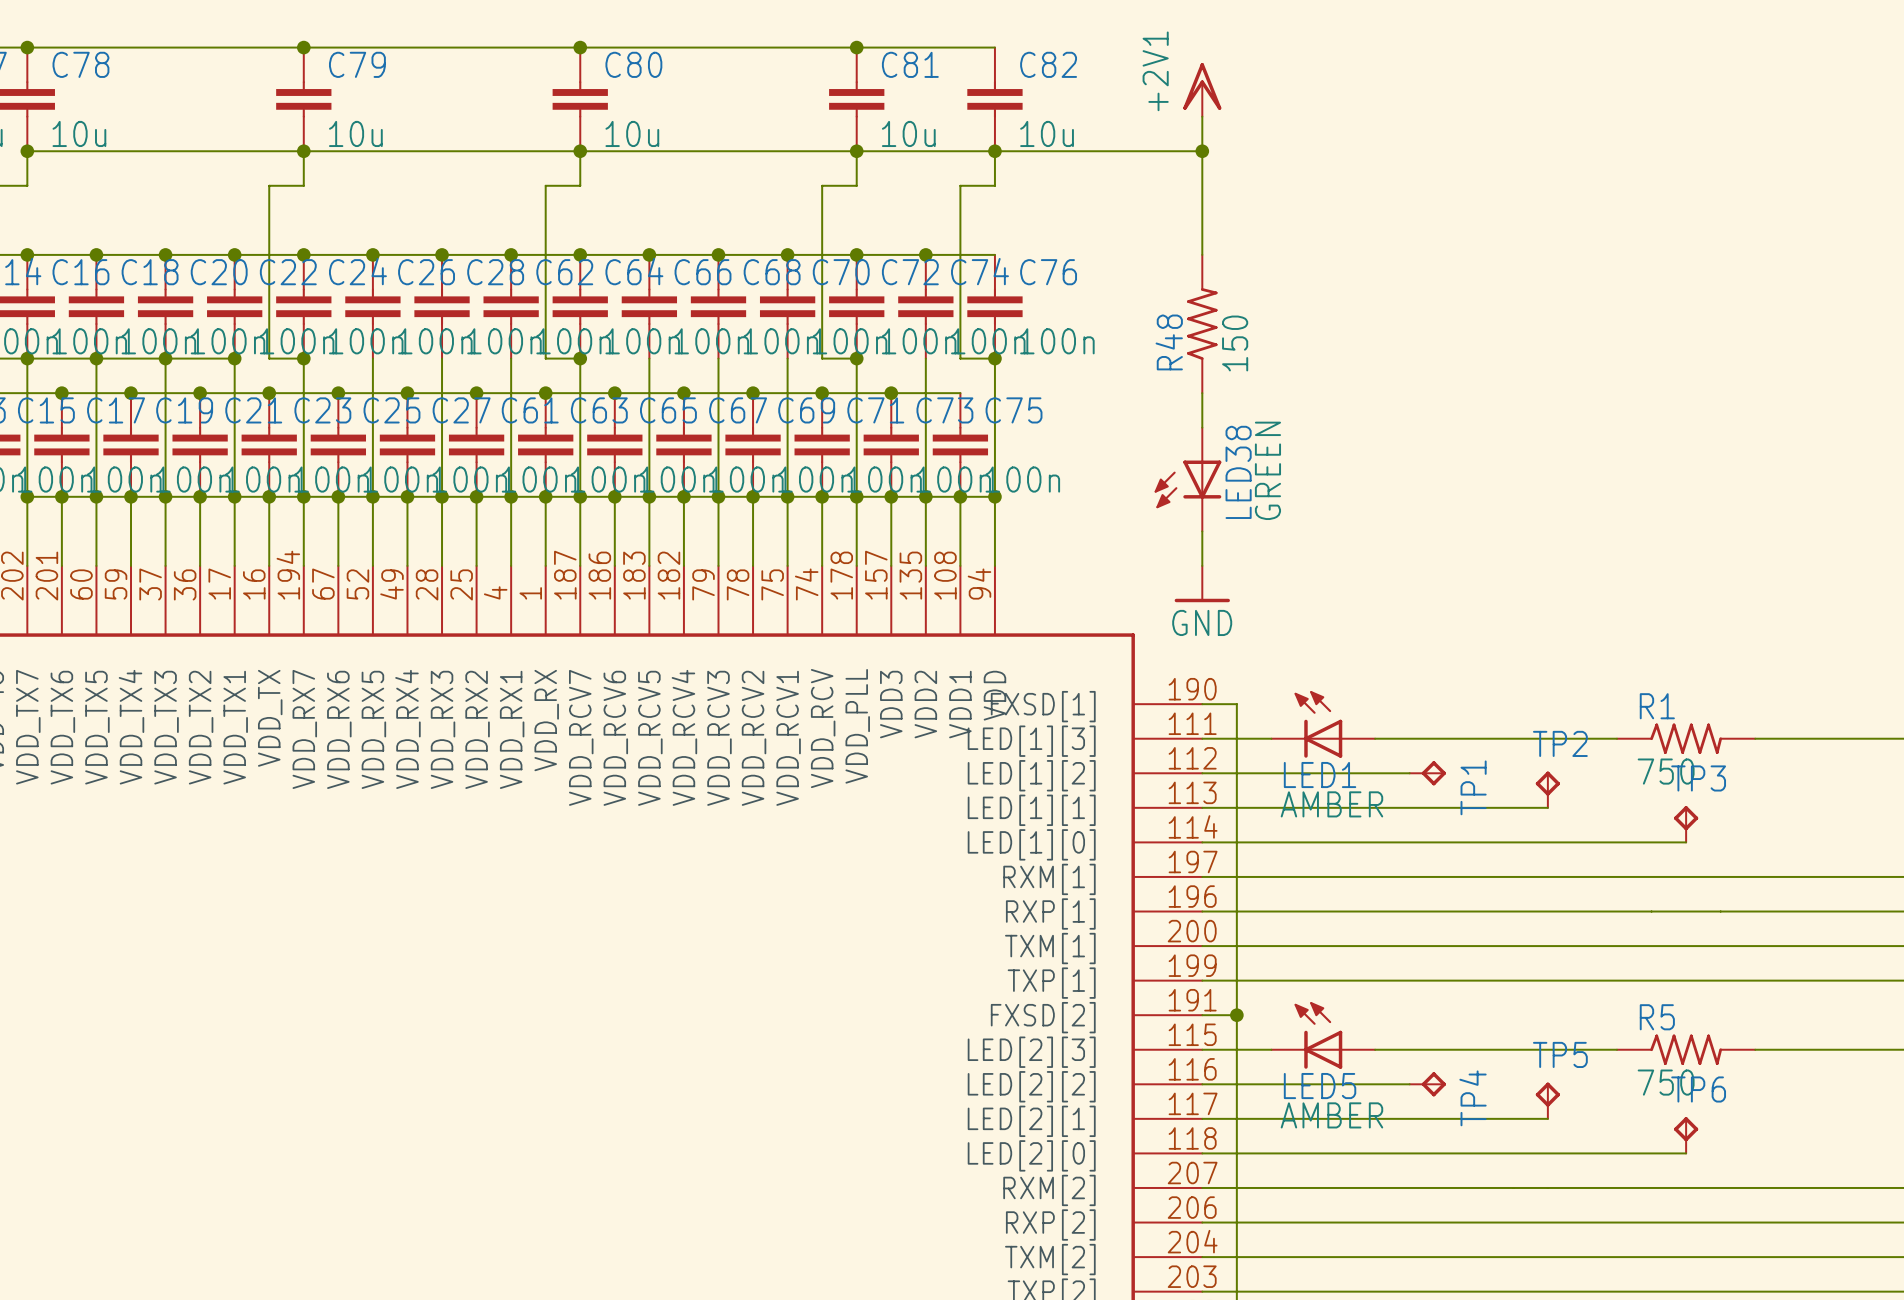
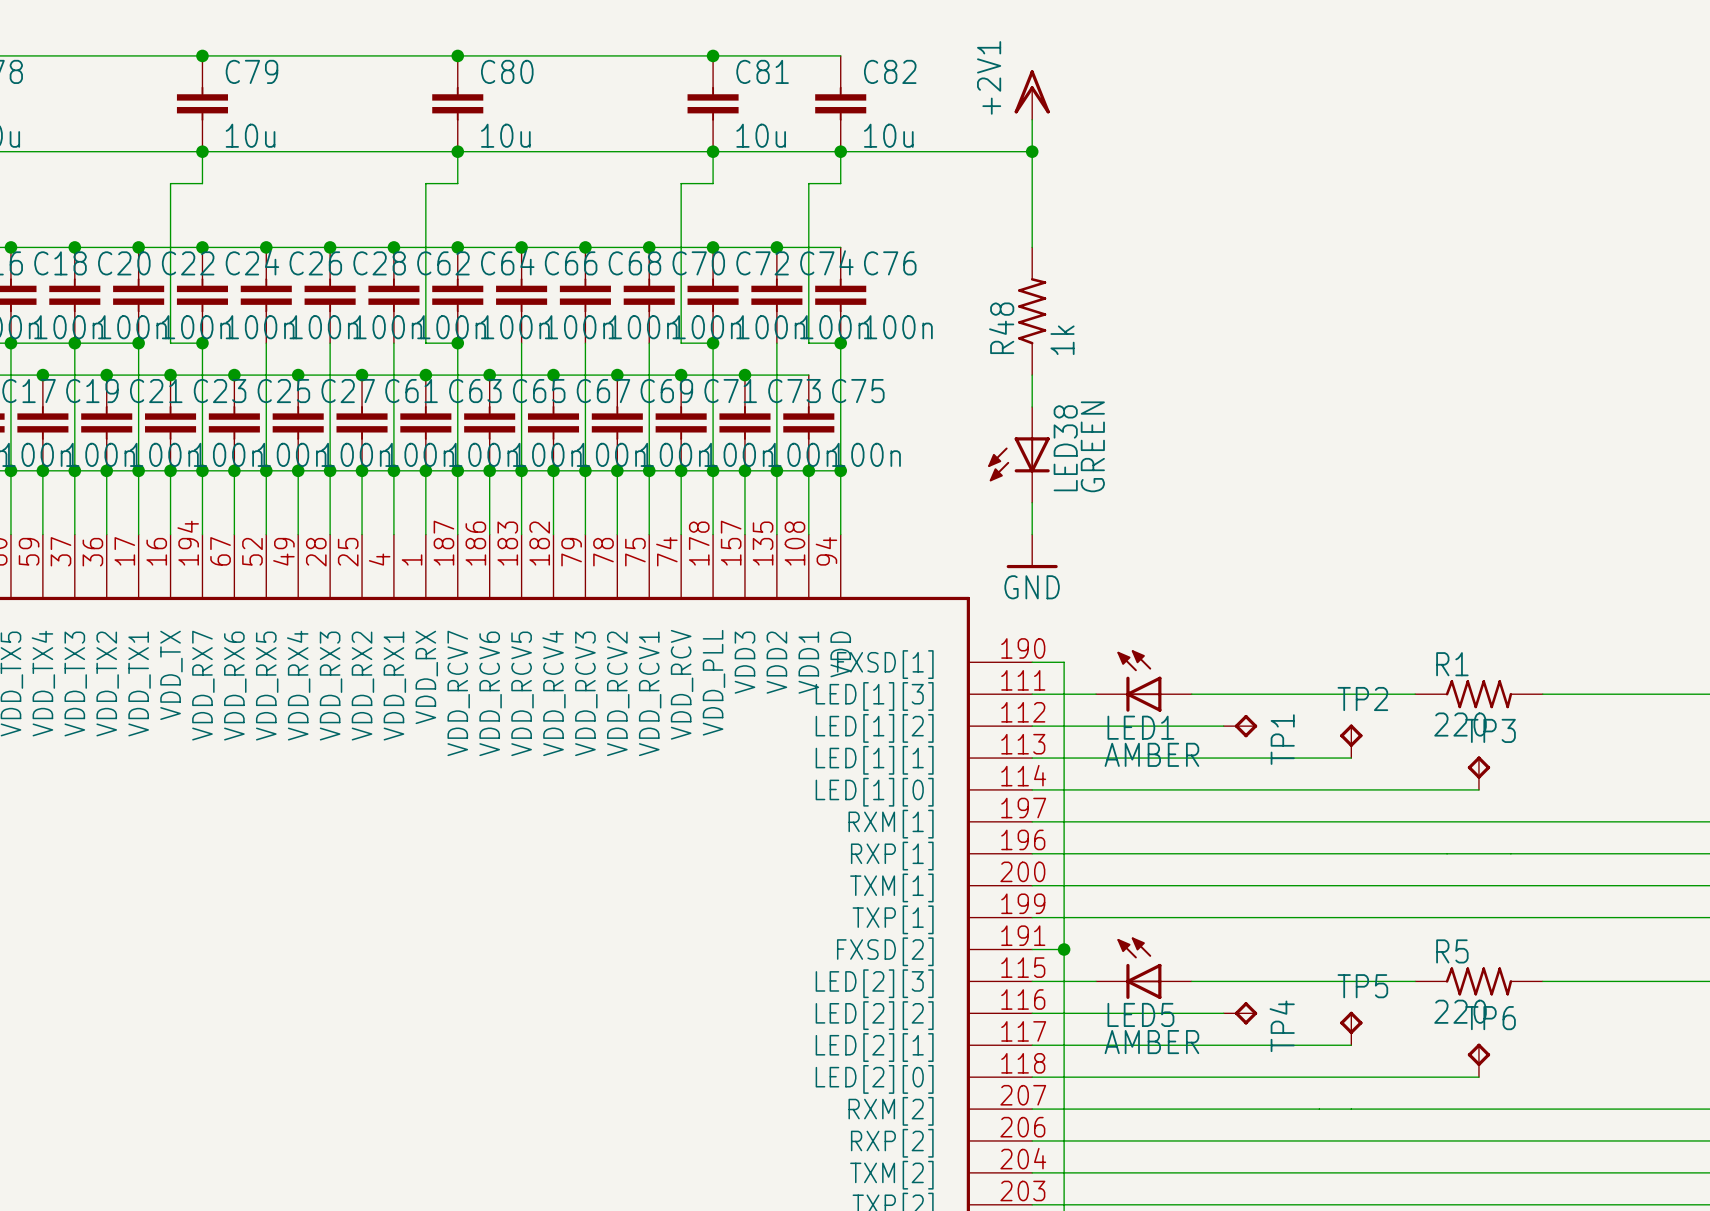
R48 value: 150 (1235, 343) -> 1k (1062, 340)
R1 value: 750 (1666, 771) -> 220 (1460, 724)
R5 value: 750 (1666, 1082) -> 220 (1460, 1011)

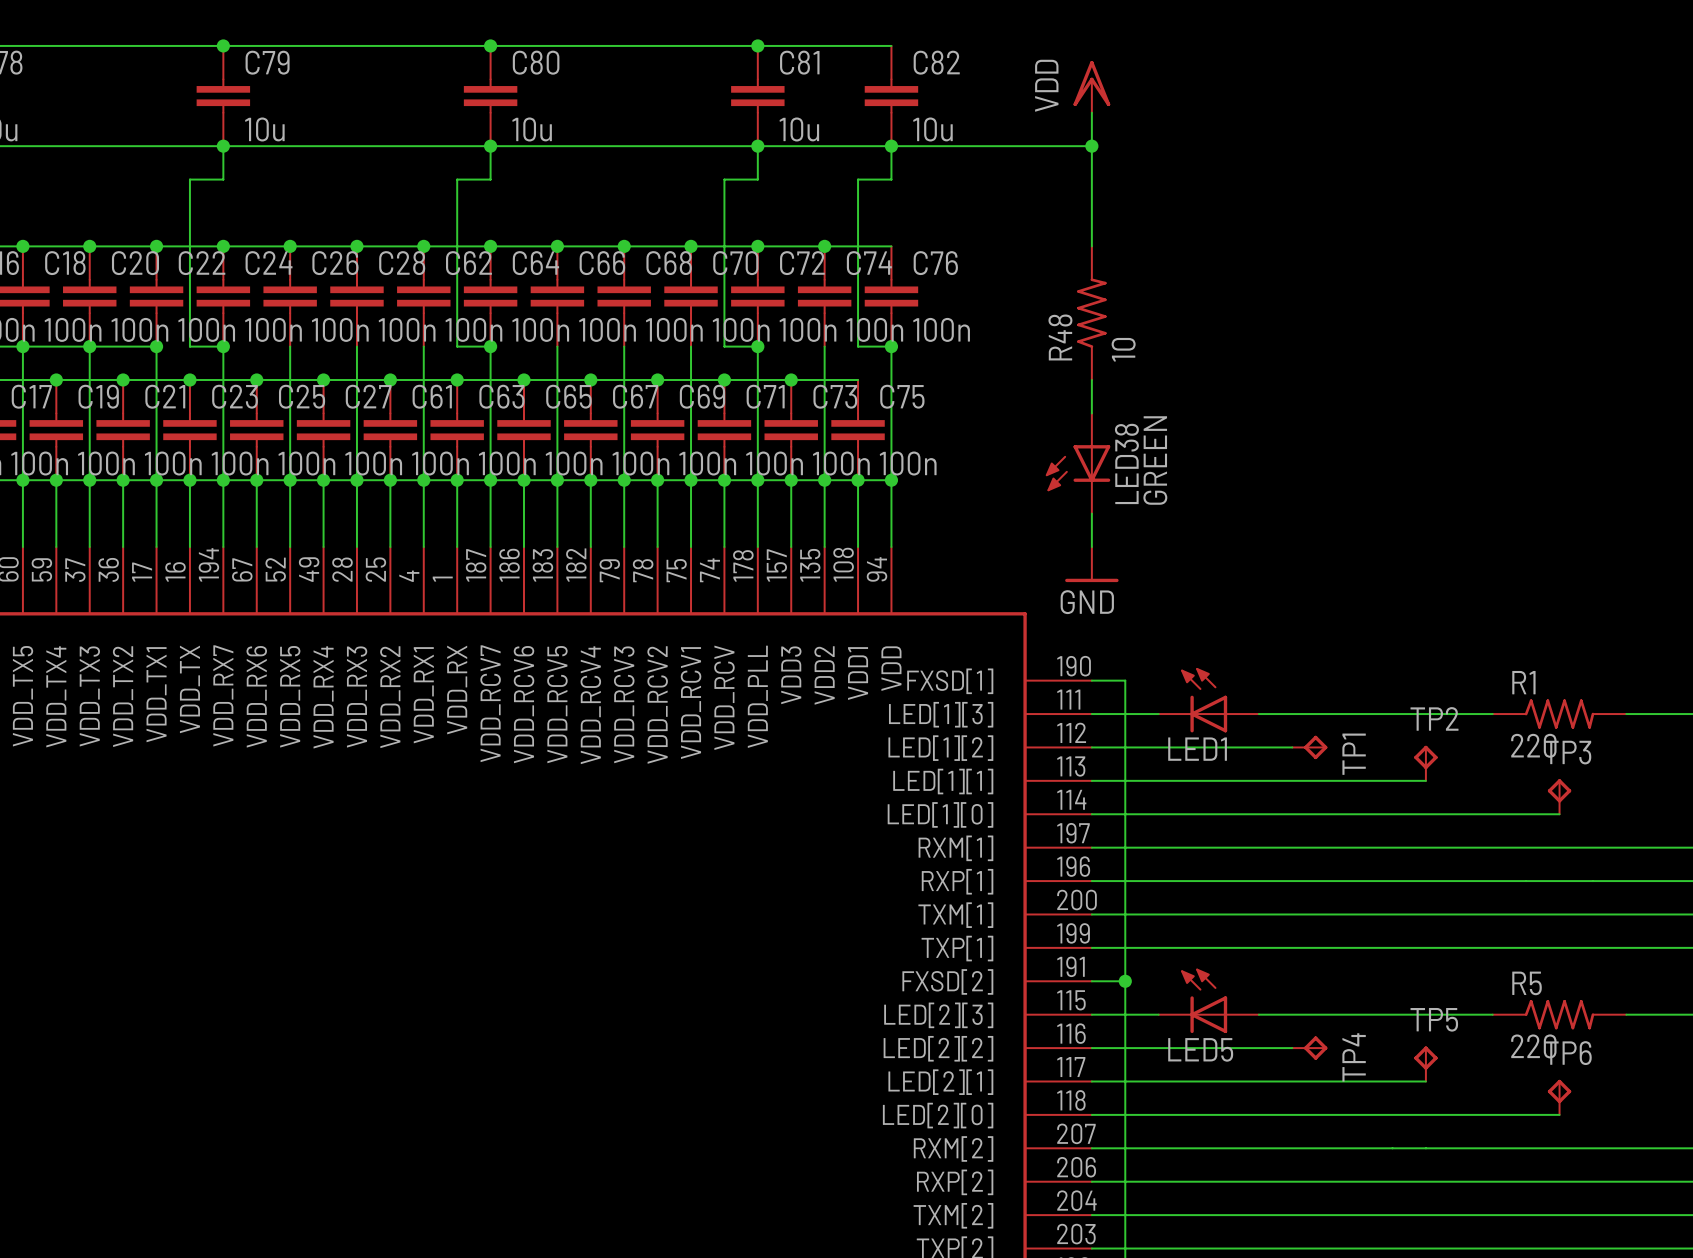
power symbol: +2V1 (1032, 95) -> VDD (1091, 86)
R48 value: 1k (1062, 340) -> 10 (1123, 349)
LED1 value: AMBER (1151, 754) -> none
LED5 value: AMBER (1151, 1042) -> none

